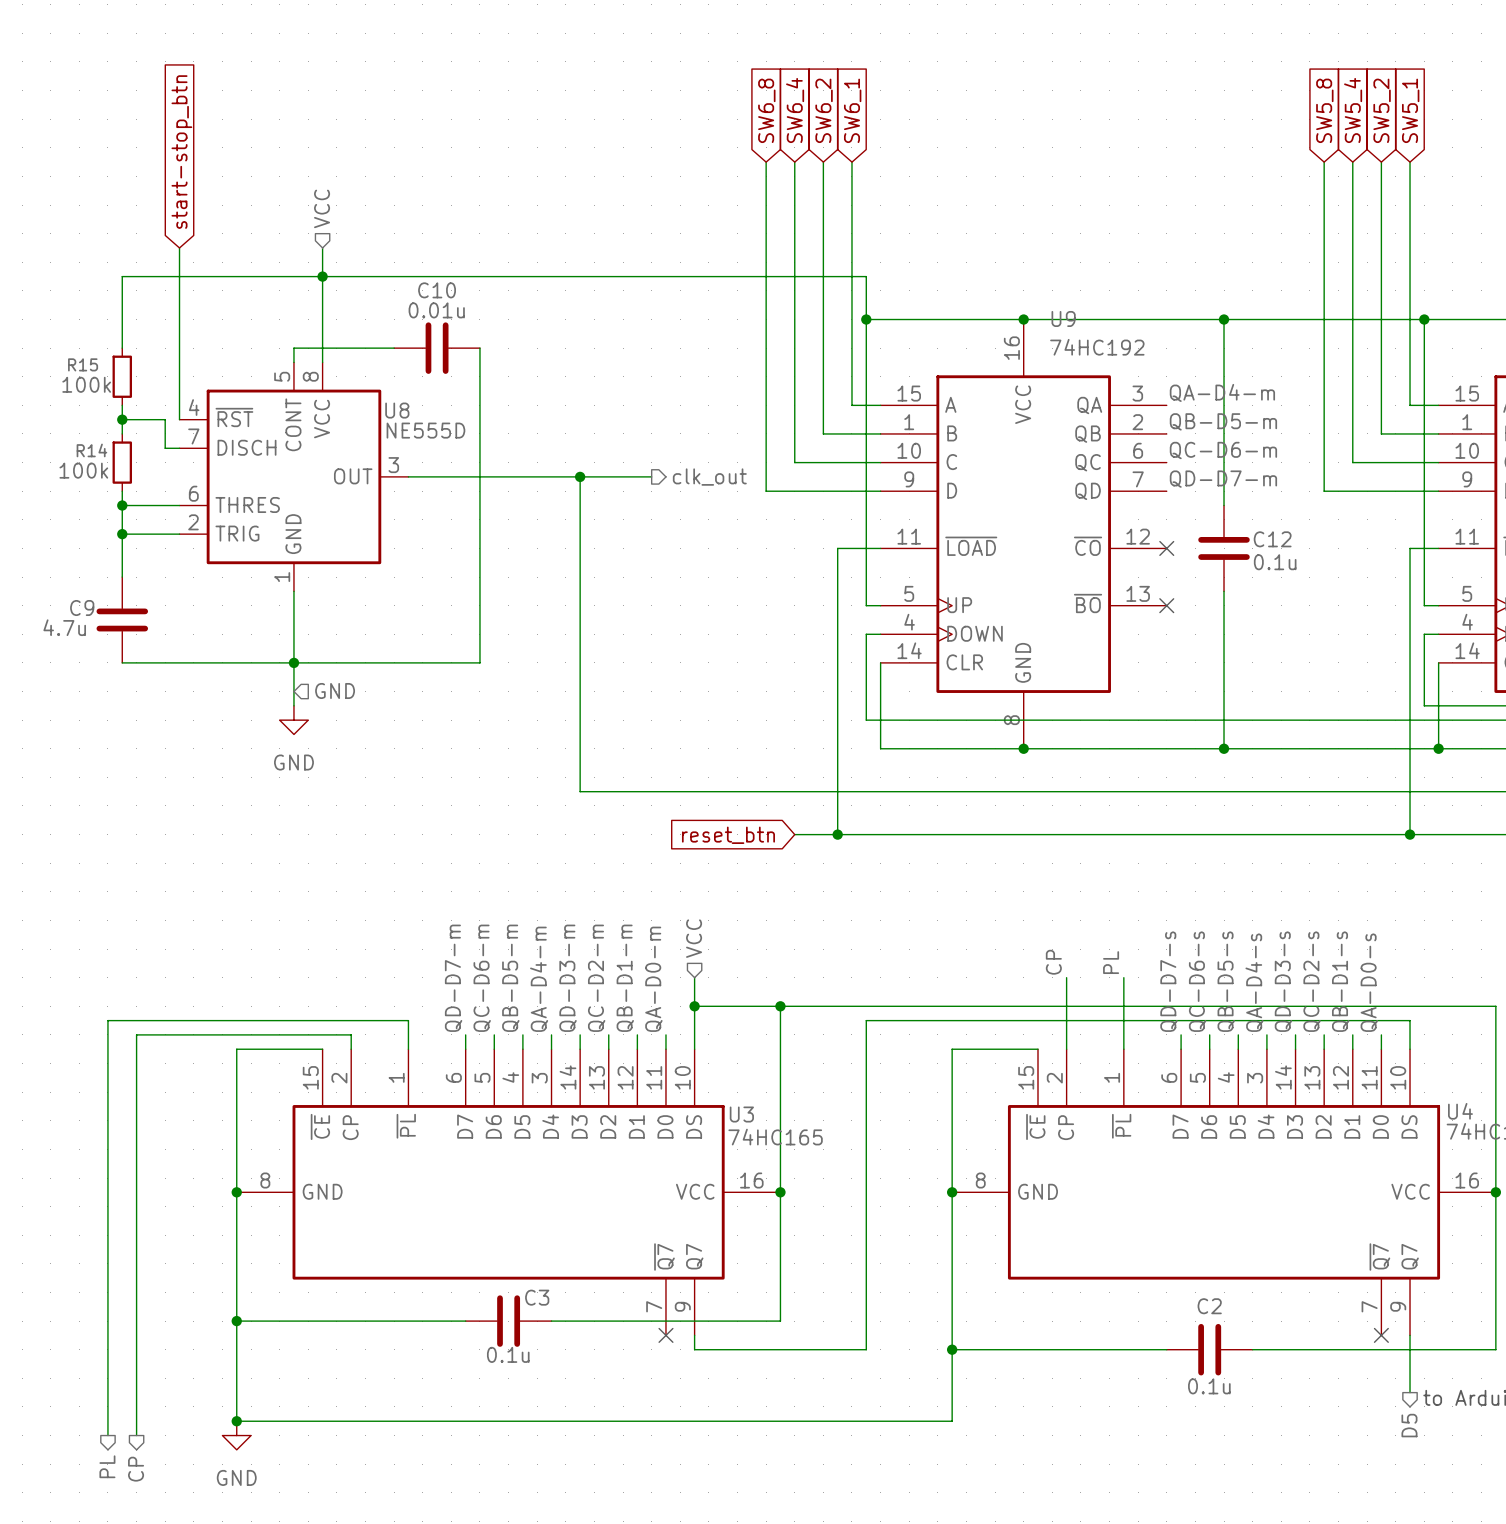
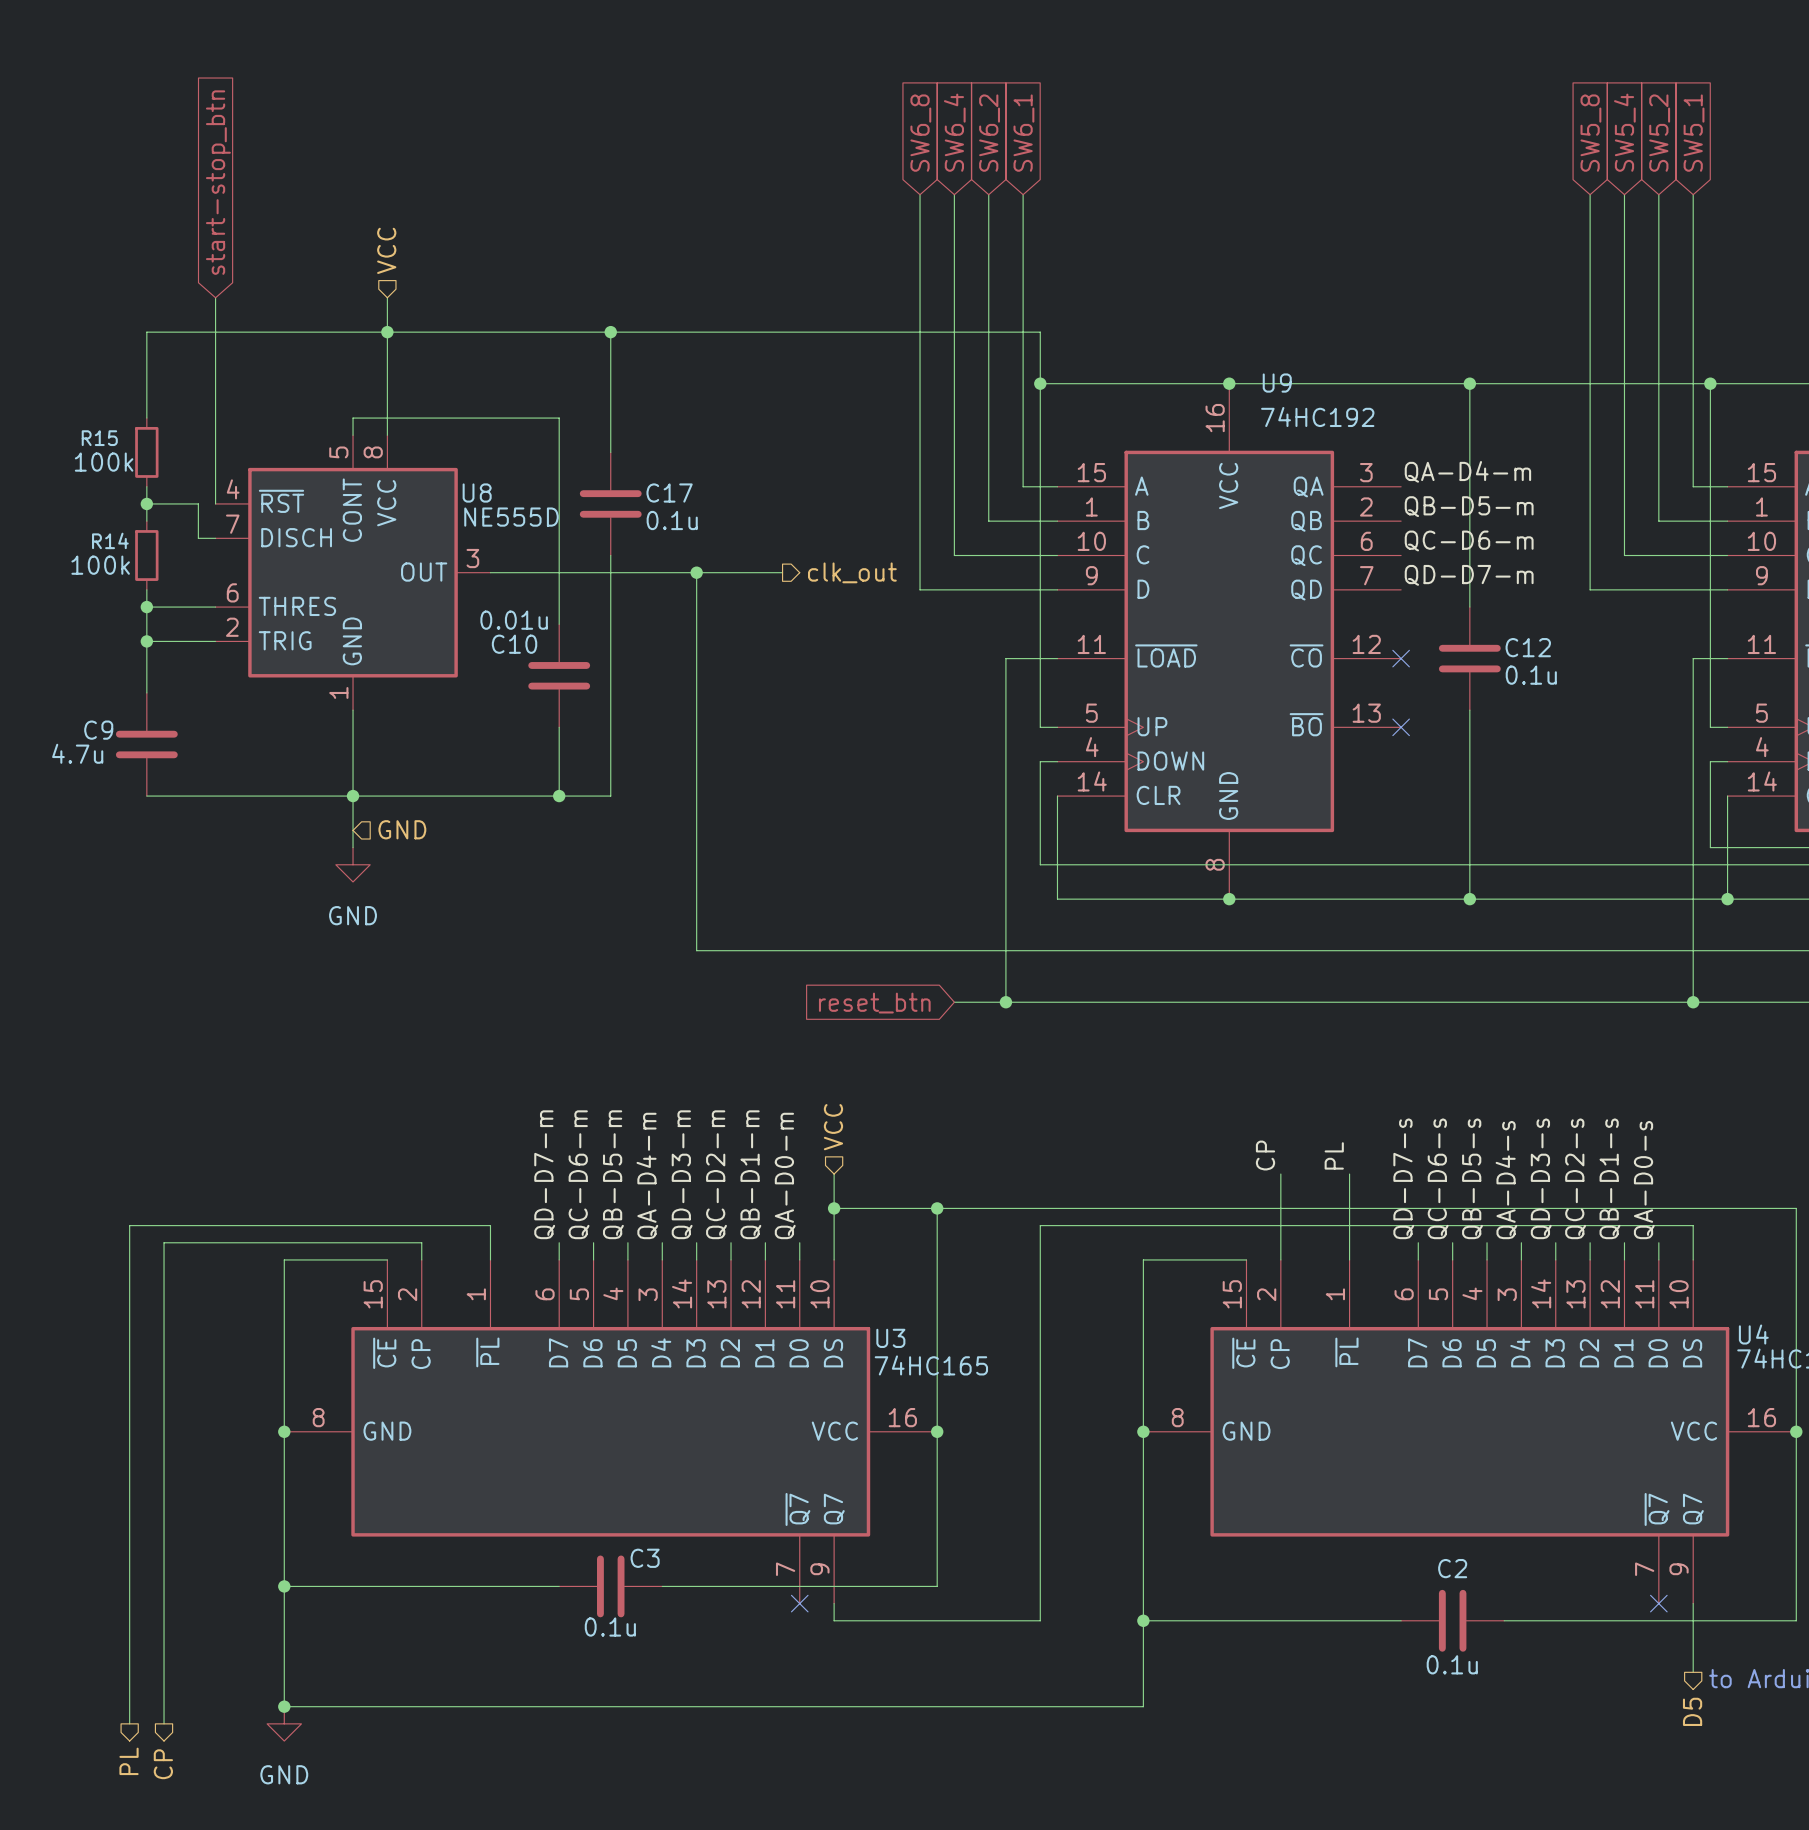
wire: none -> (610, 332) (610, 452)
junction: none -> (610, 332)
C10 name position: C10 (437, 290) -> C10 (514, 644)
C10 value position: 0.01u (436, 310) -> 0.01u (514, 620)
wire: none -> (473, 418) (559, 418) (559, 624)
C10 rotation: 0° (437, 348) -> 90° clockwise (559, 675)
C10 position: (437, 348) -> (559, 675)
wire: (479, 348) (479, 662) -> (610, 555) (610, 796) (576, 796)
C17: none -> 0.1u (610, 503)
wire: none -> (559, 727) (559, 796)
junction: none -> (559, 796)

